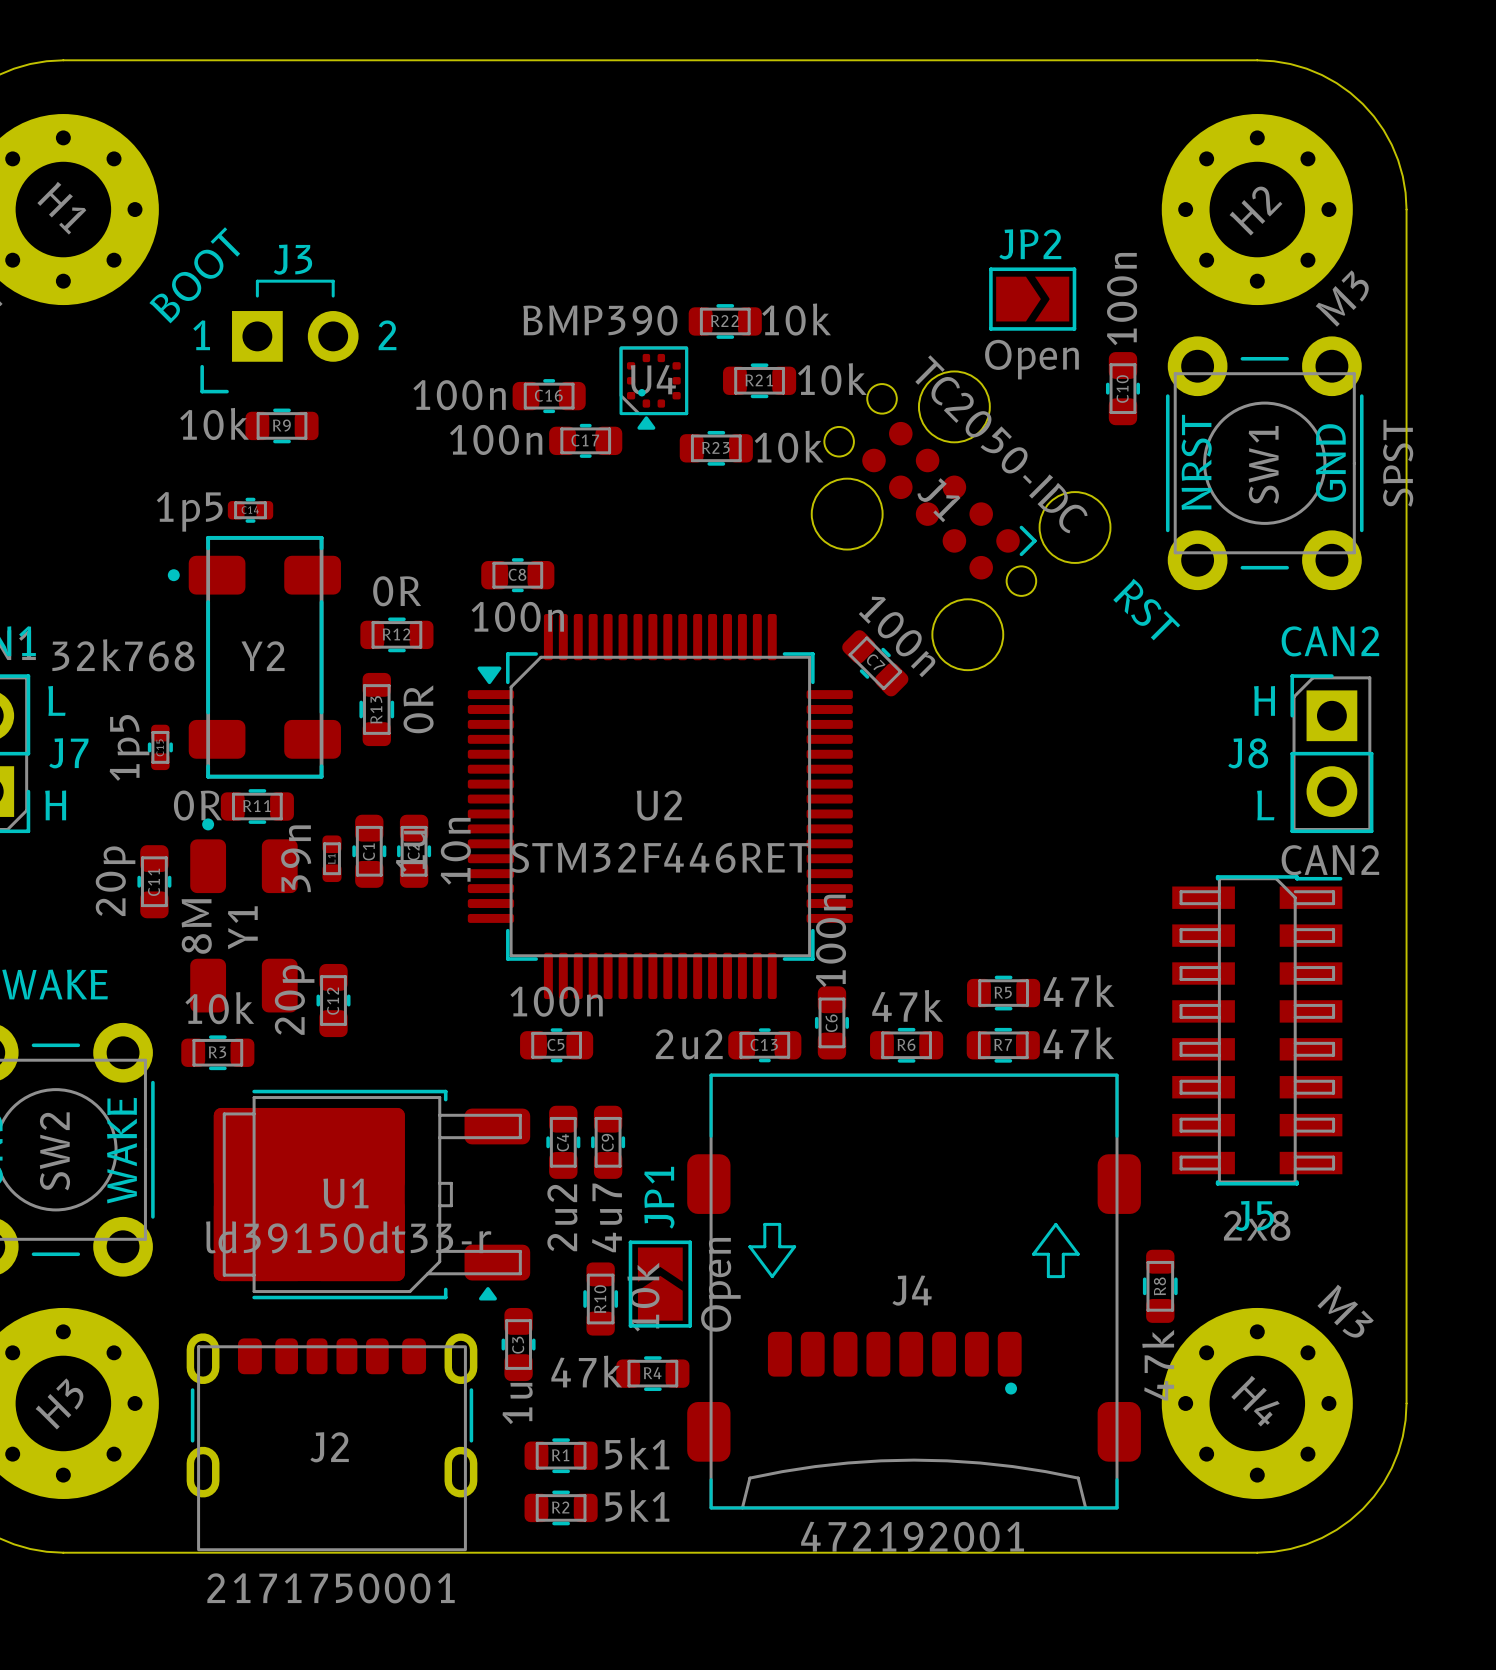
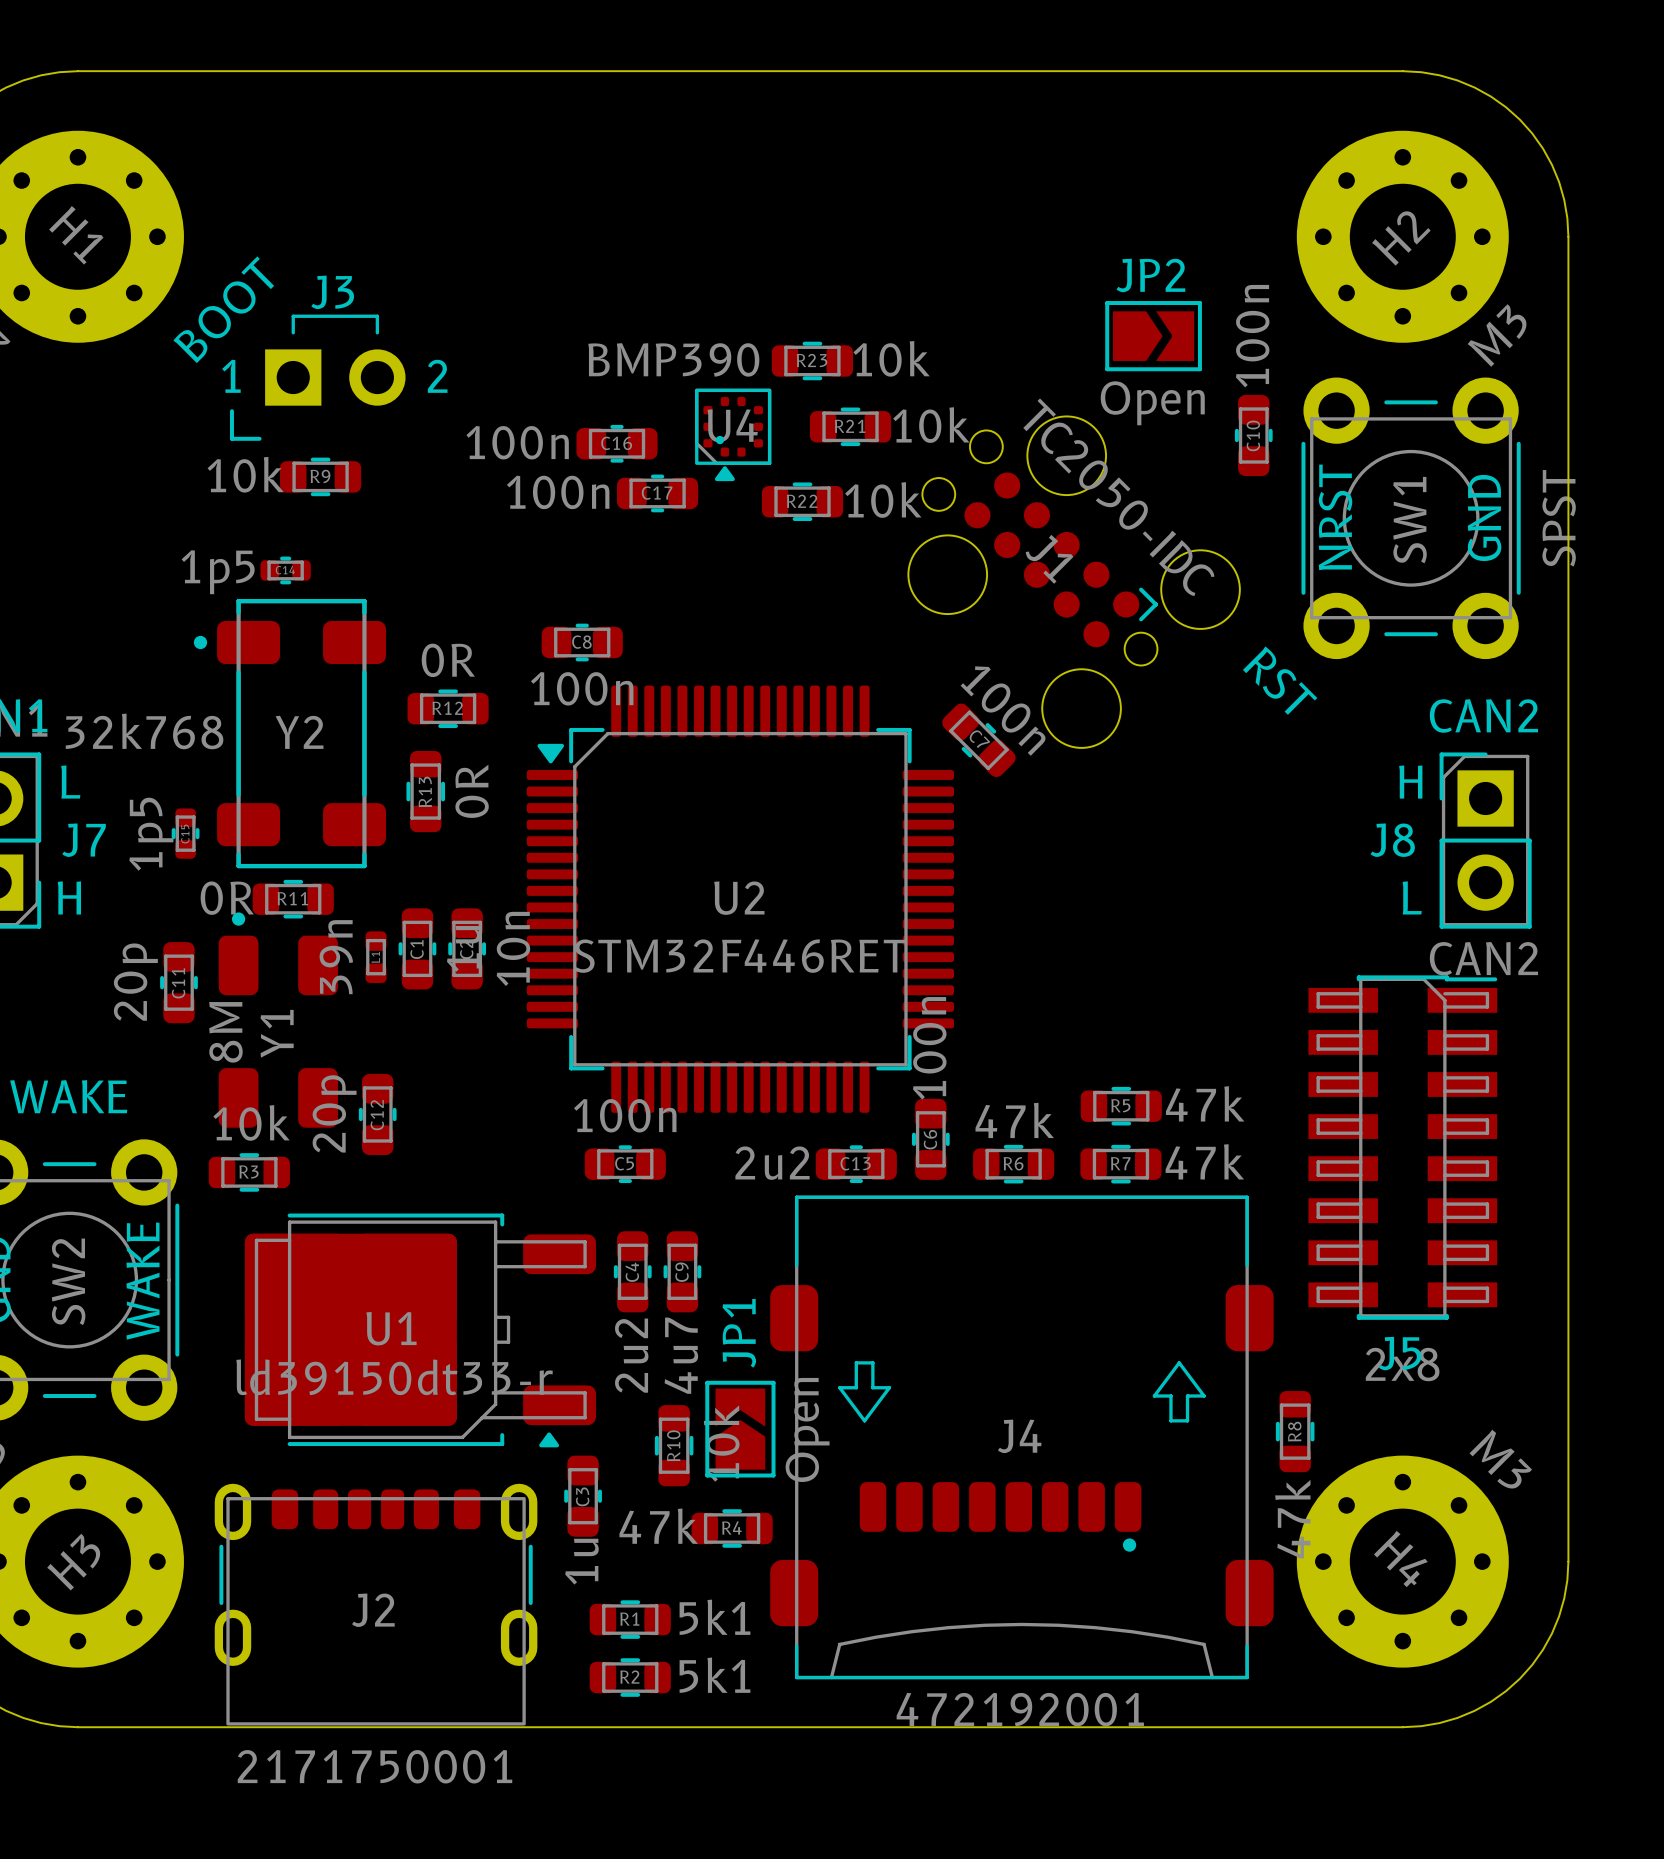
R22 name: R22 (724, 321) -> R23 (812, 360)
R23 name: R23 (715, 447) -> R22 (802, 501)

